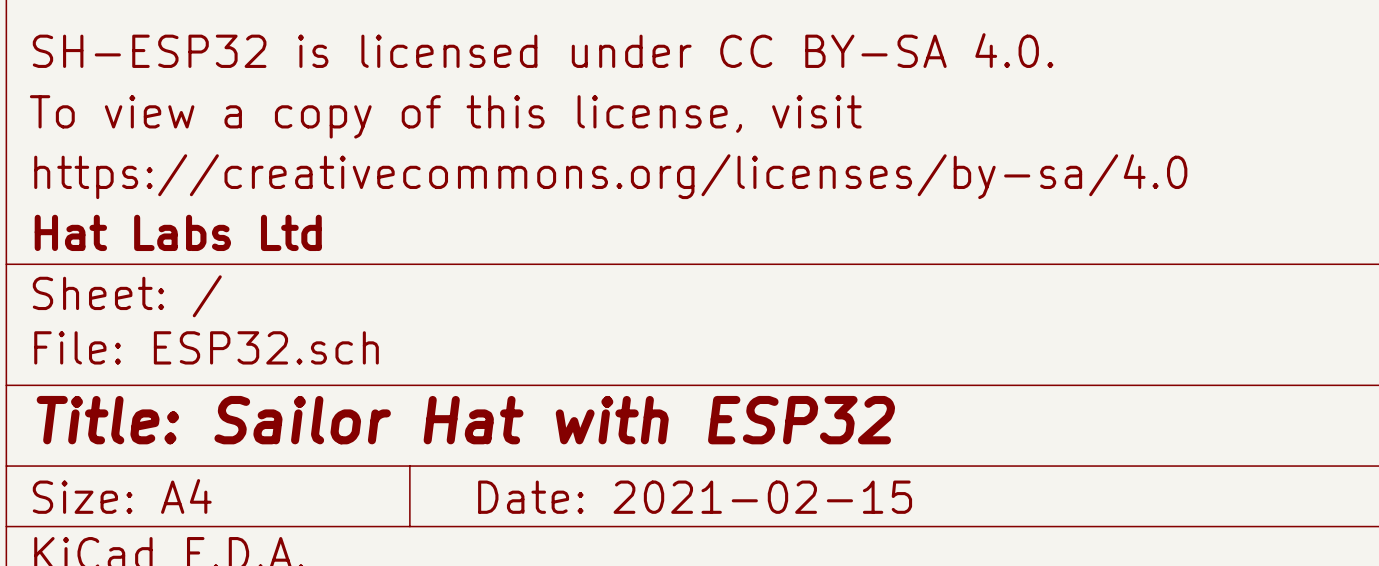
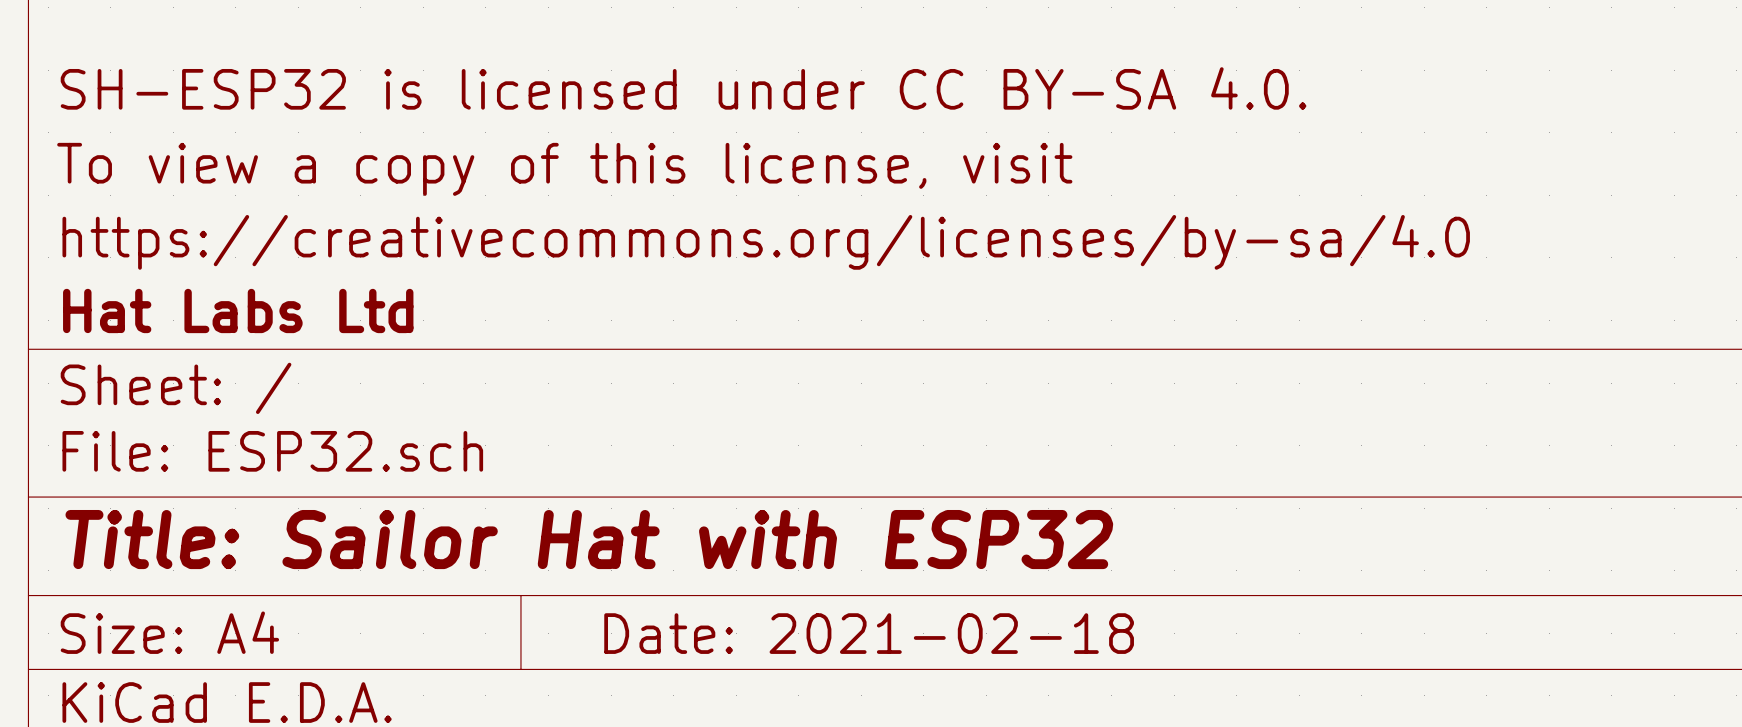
title block: Date: 2021-02-15 (695, 497) -> Date: 2021-02-18 (869, 633)

